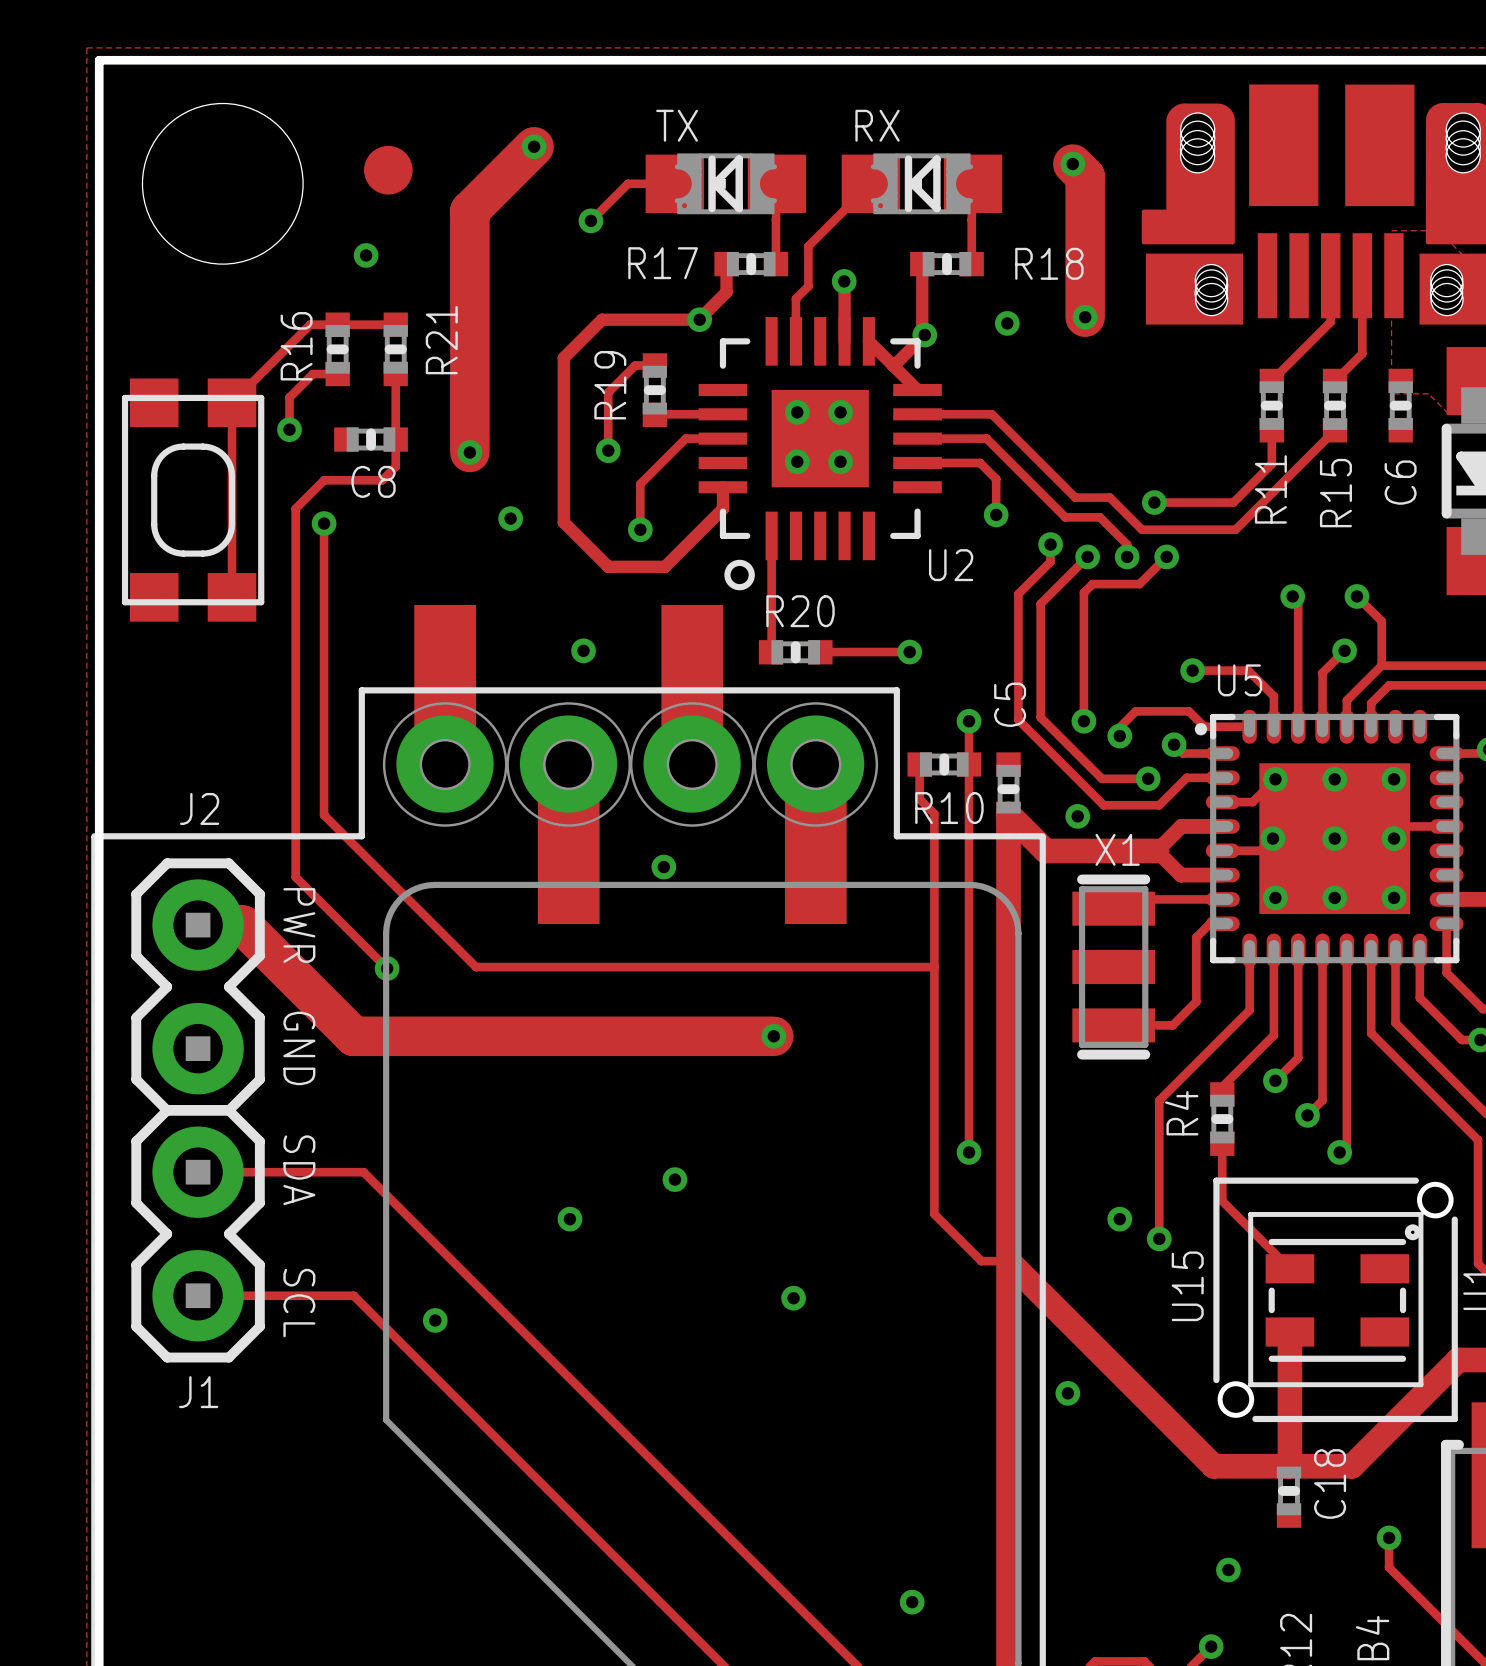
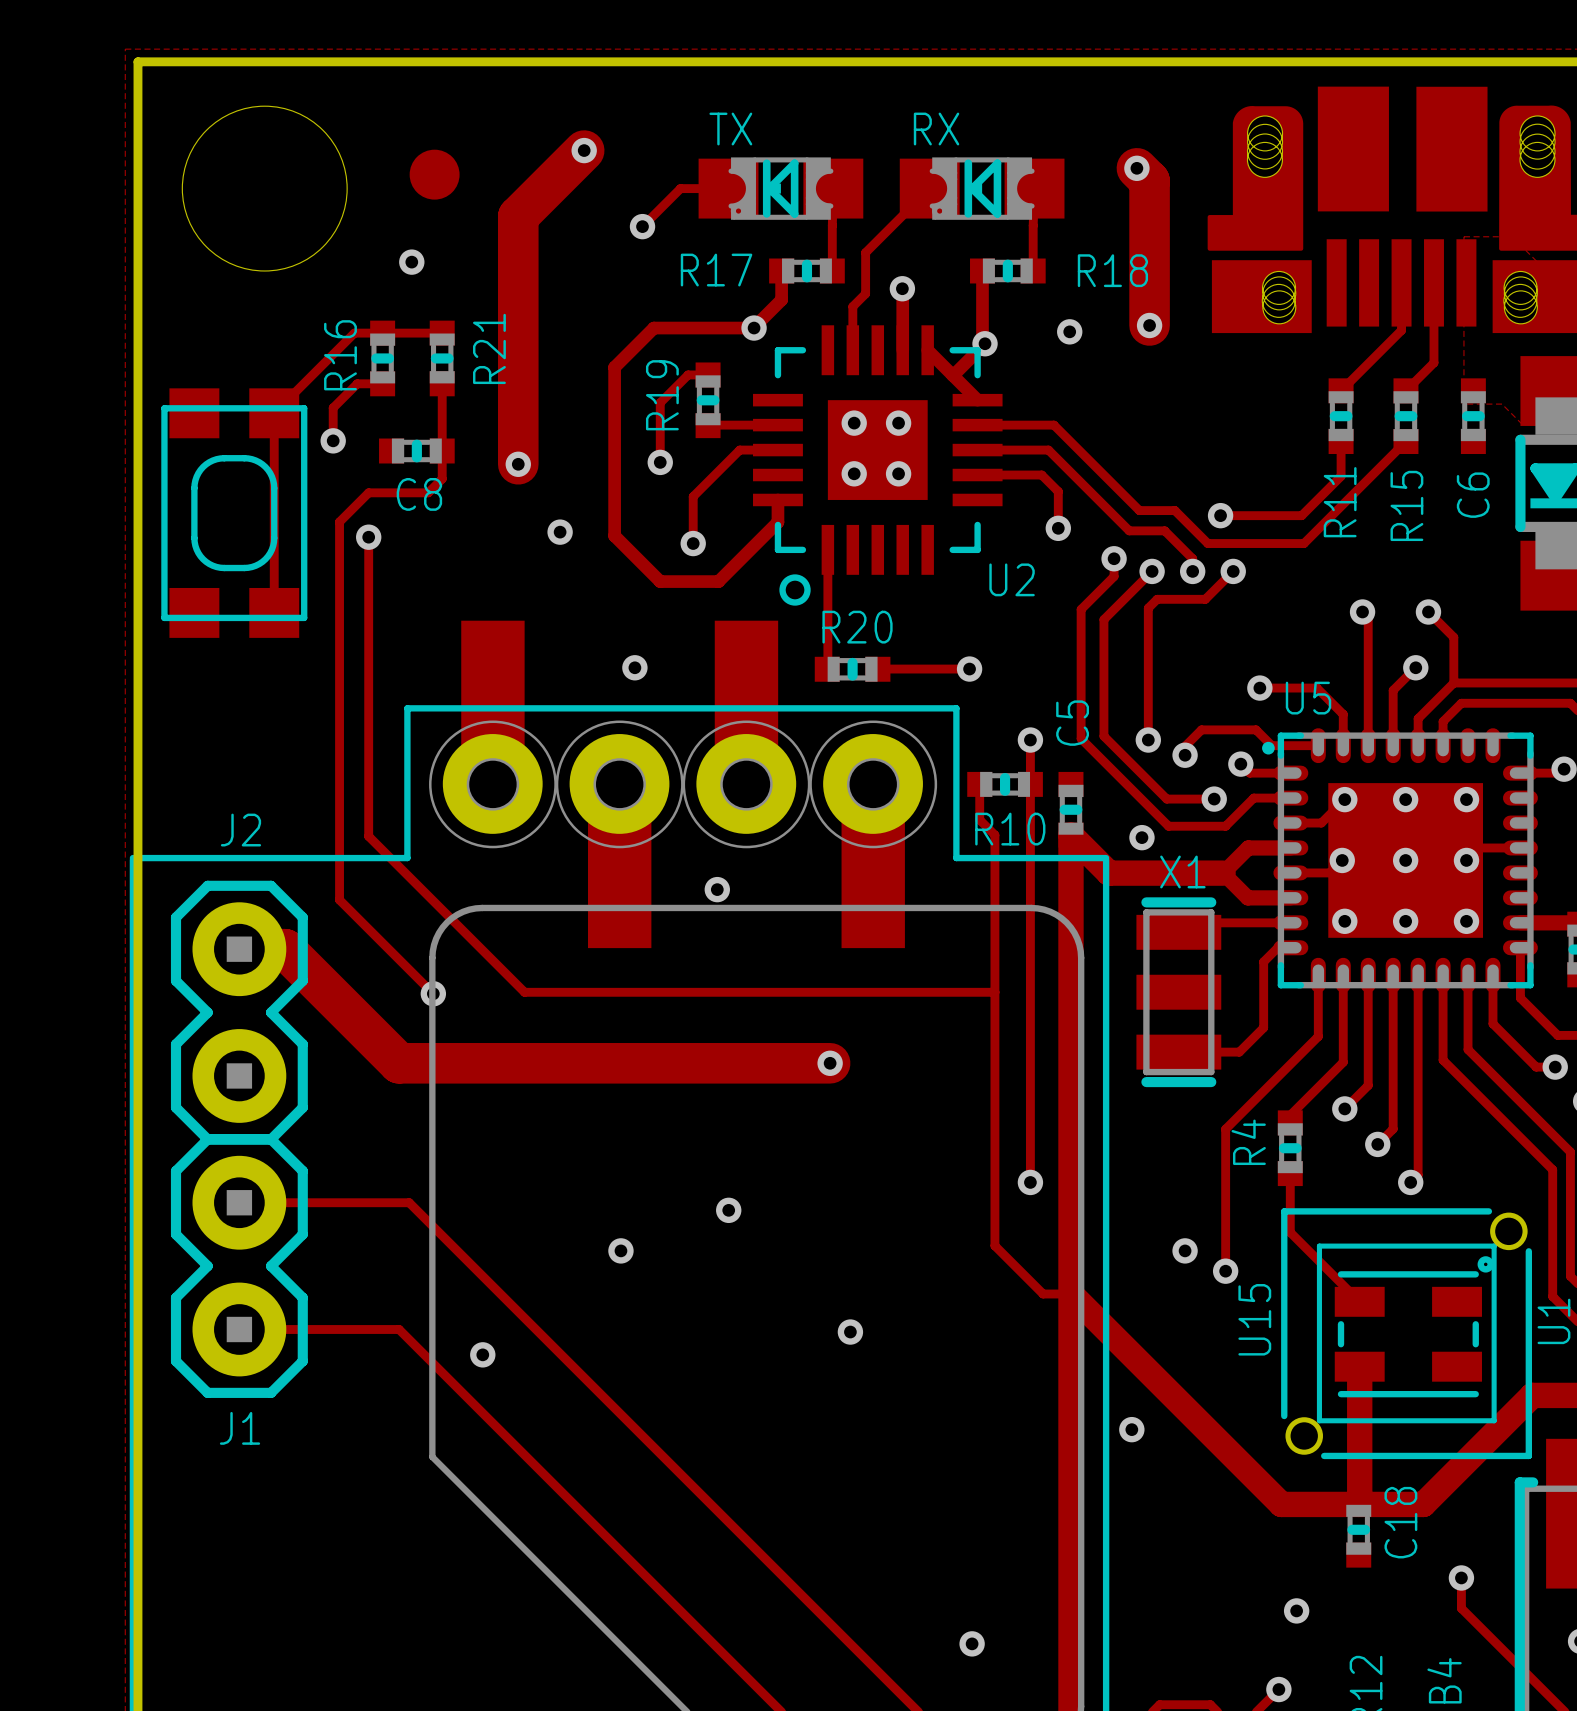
text: PWR (299, 925) -> none
text: GND (299, 1048) -> none
text: SDA (299, 1170) -> none
text: SCL (299, 1303) -> none

